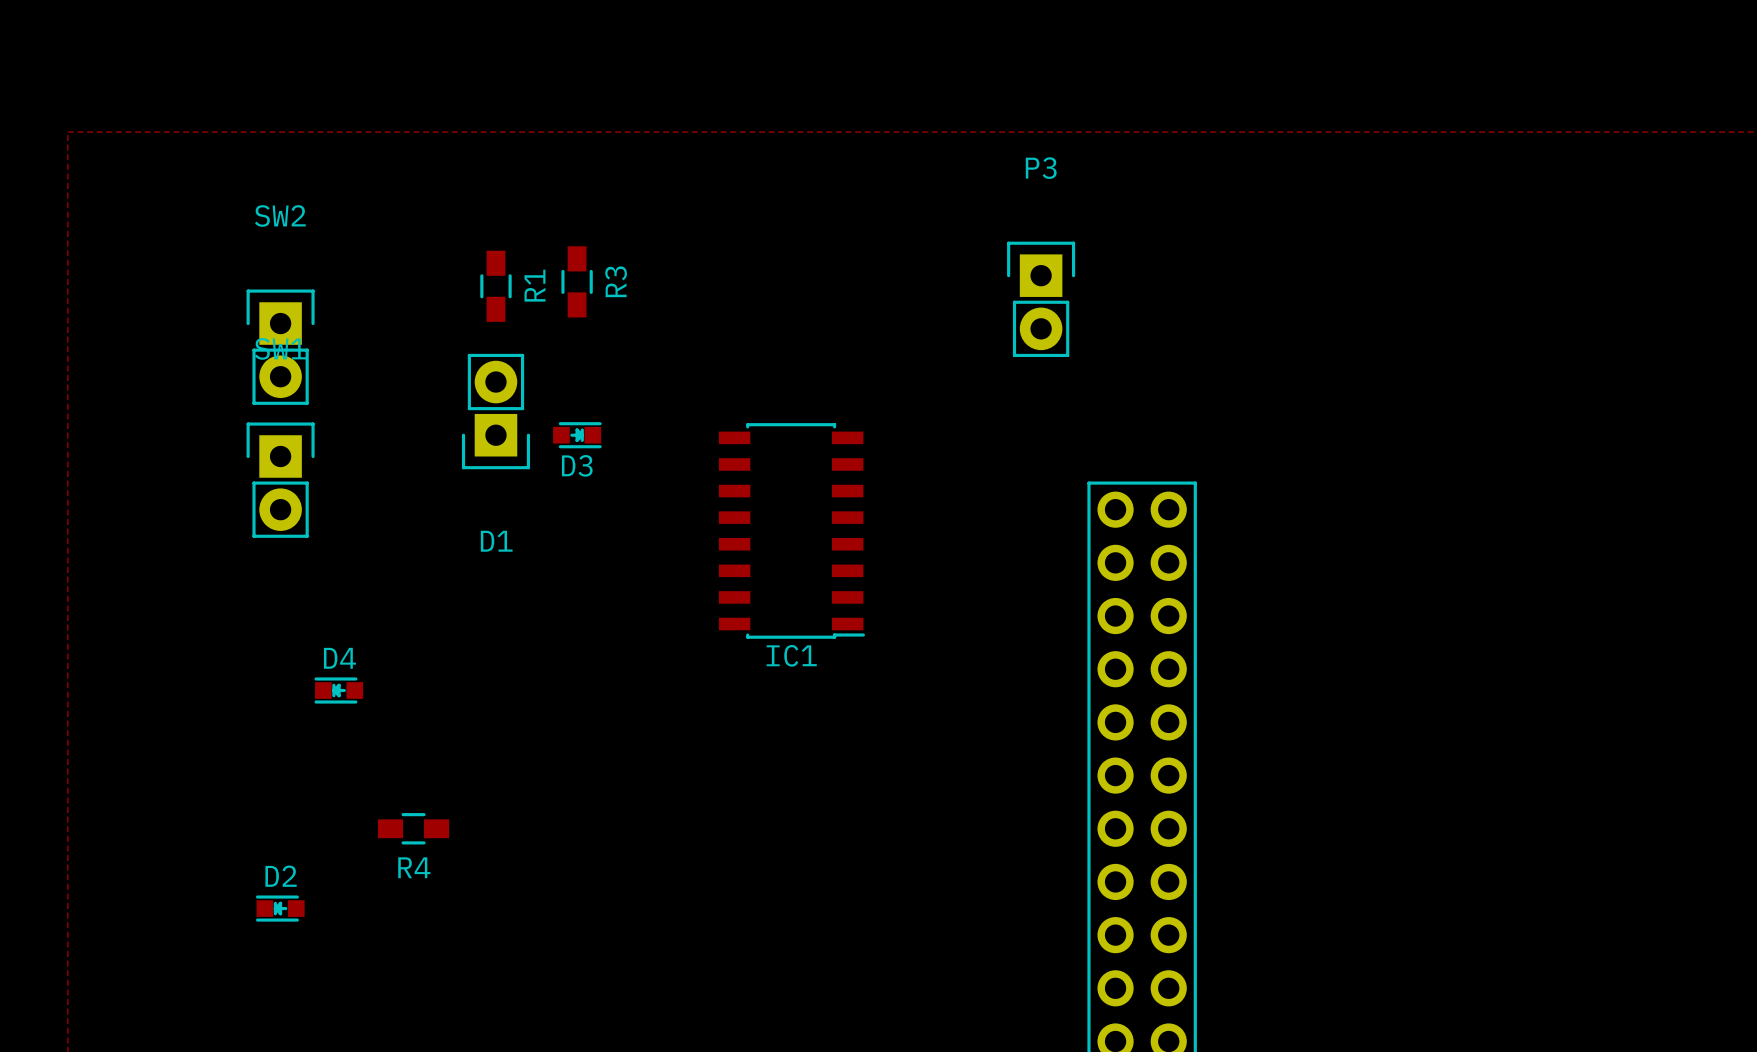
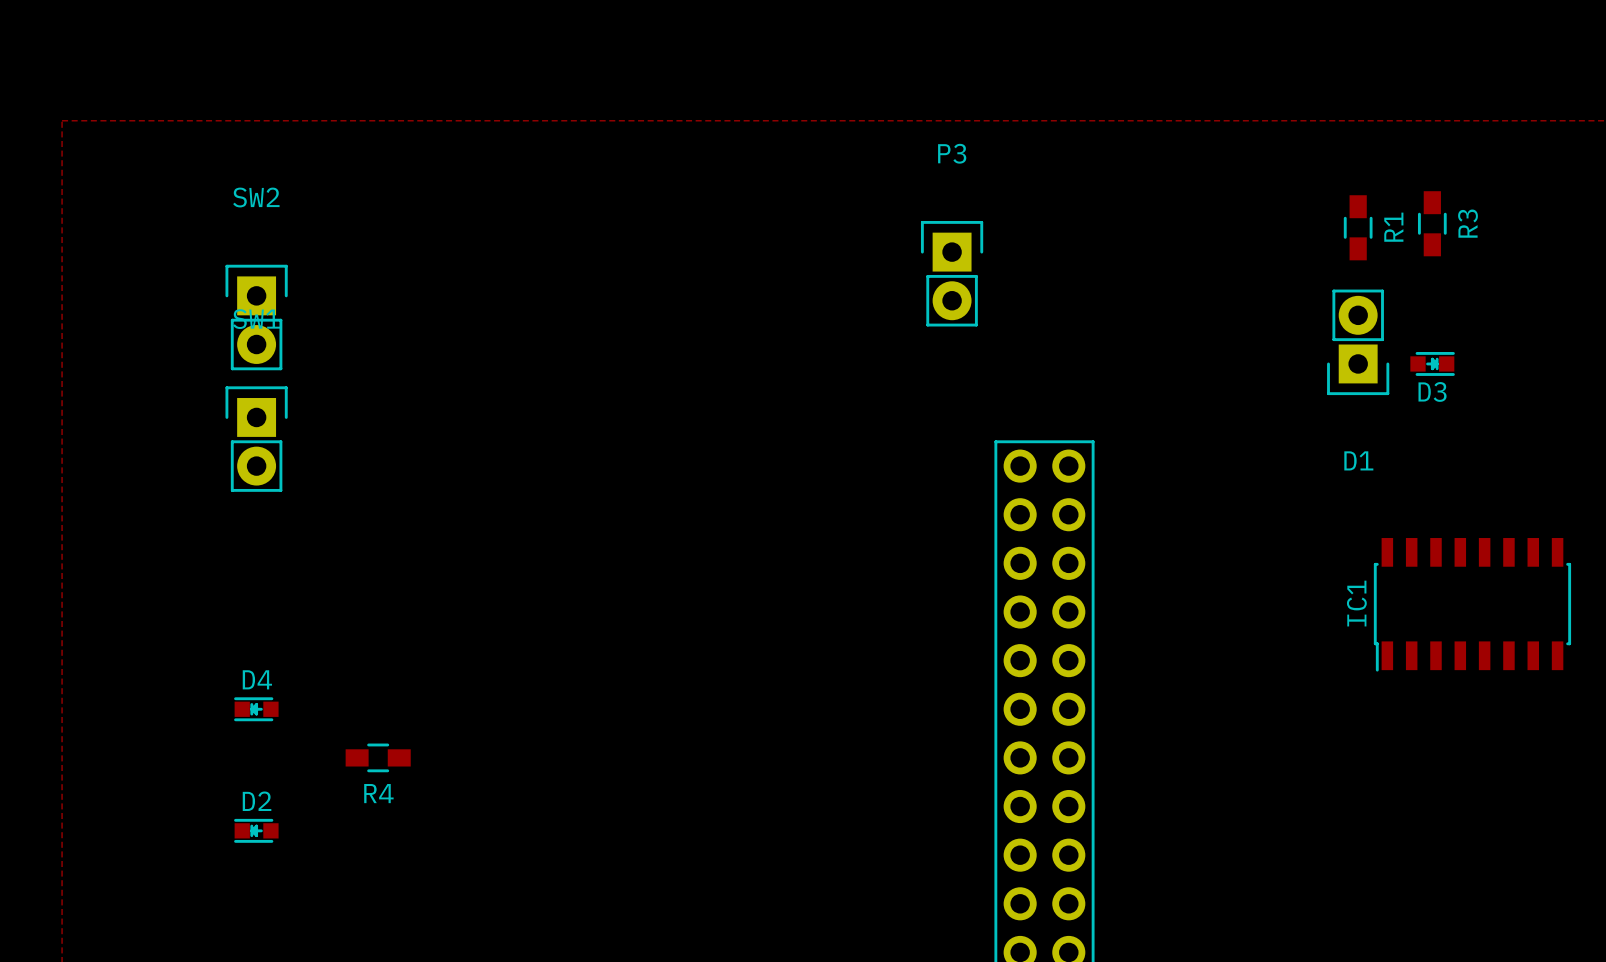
R3 position: (577, 281) -> (1432, 223)
R1 position: (495, 286) -> (1358, 227)
D1 position: (495, 411) -> (1358, 342)
D3 position: (577, 435) -> (1432, 363)
IC1 rotation: 0° (791, 530) -> 90° clockwise (1472, 604)
IC1 position: (791, 530) -> (1472, 604)
D4 position: (338, 690) -> (256, 709)

